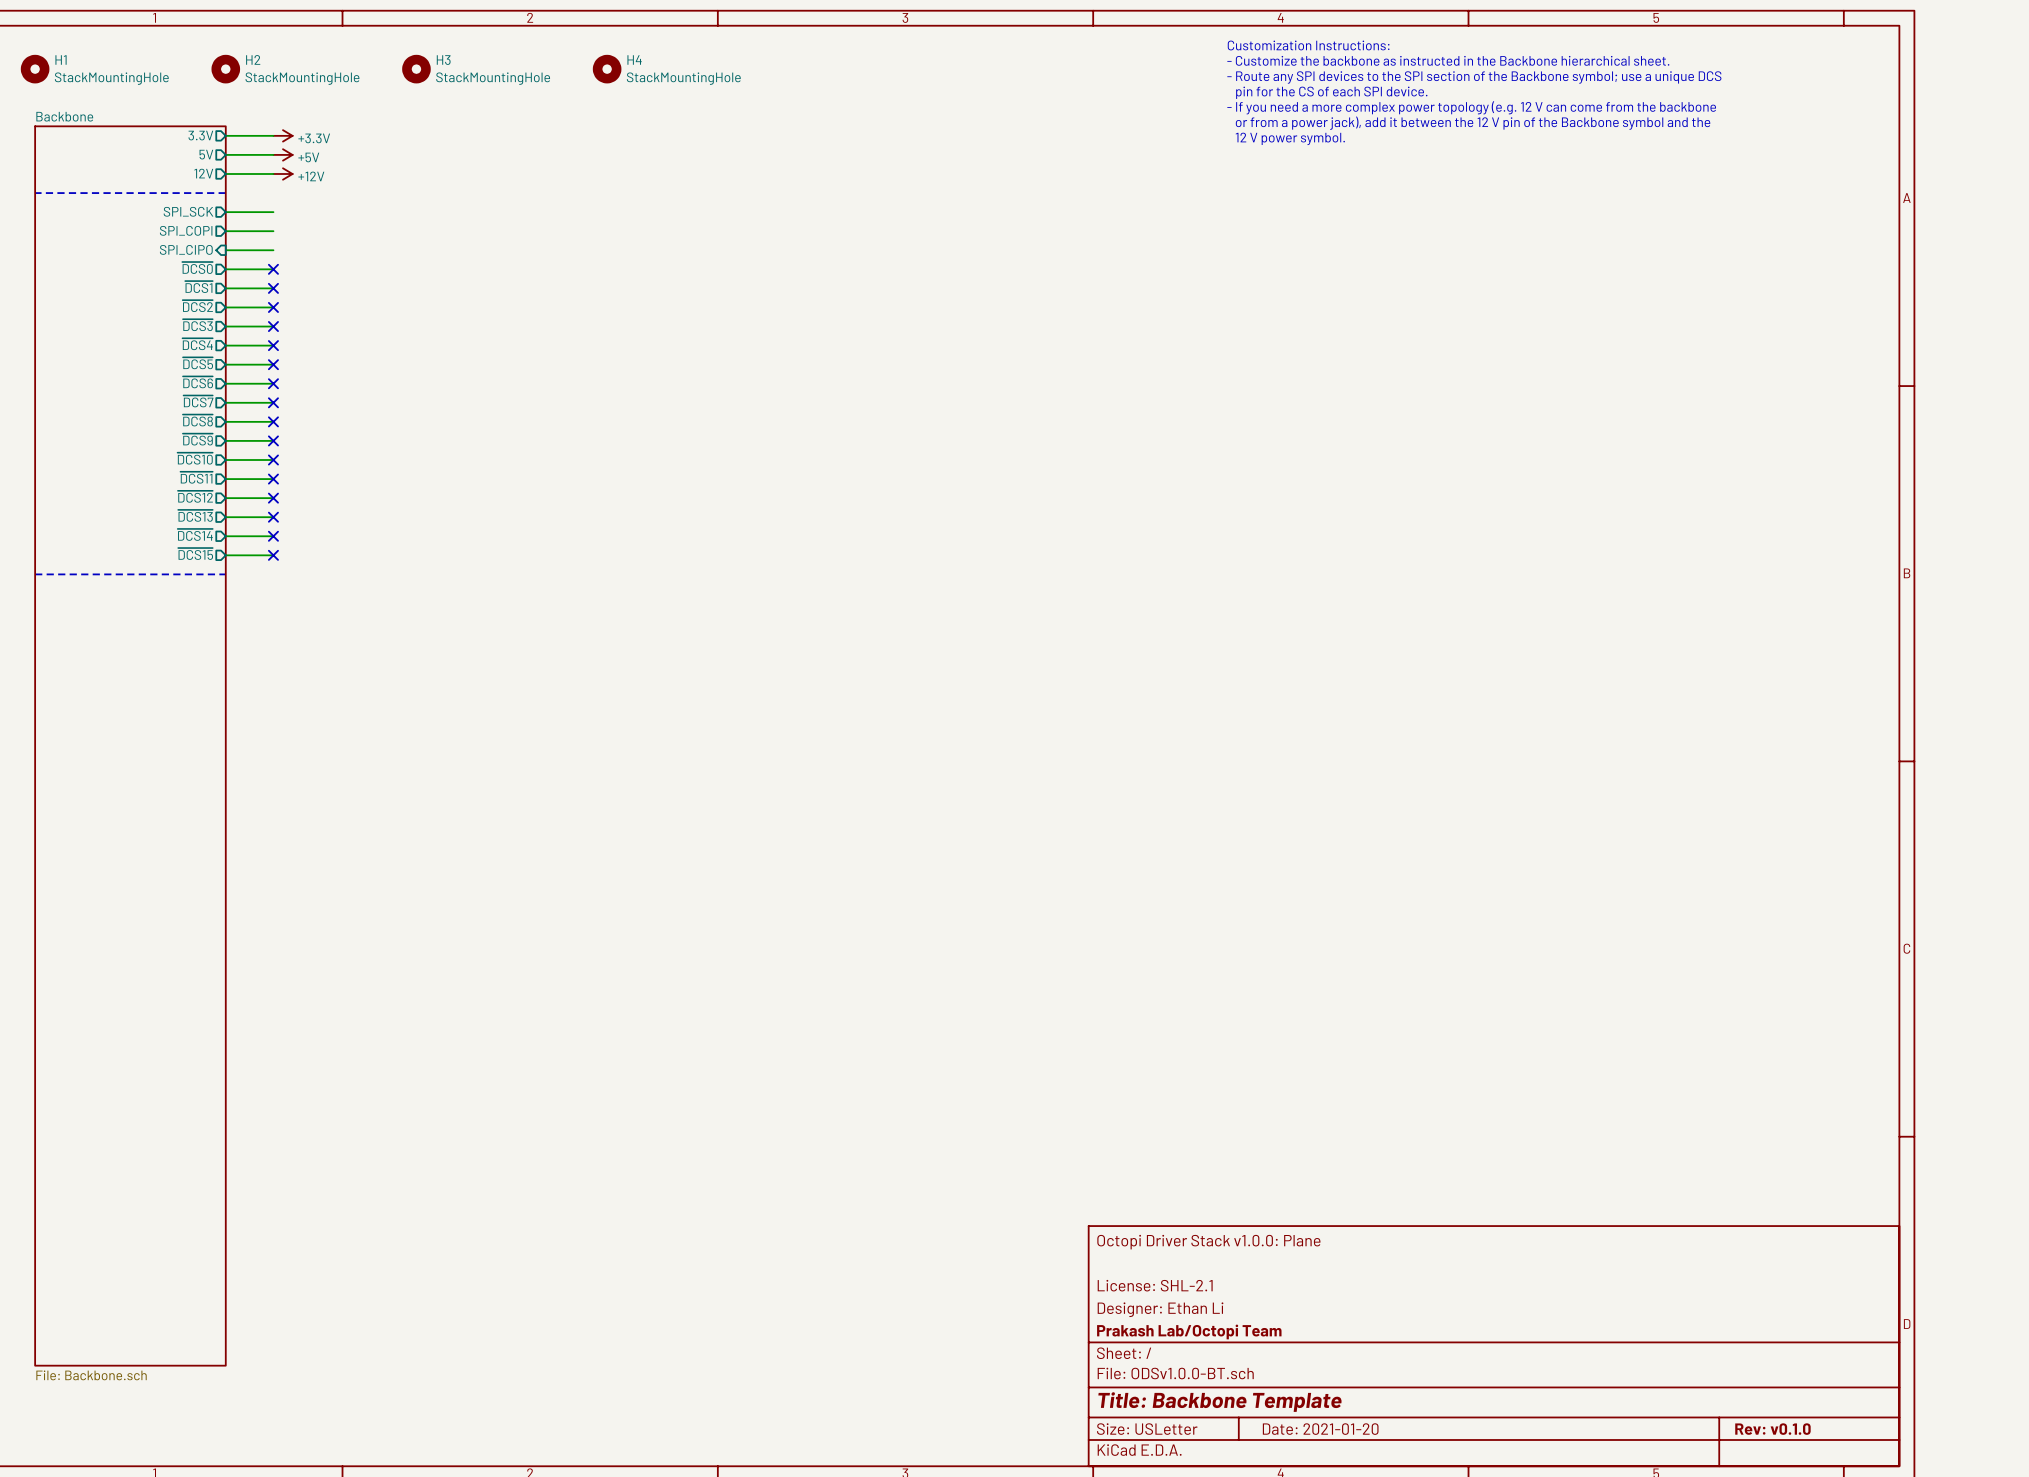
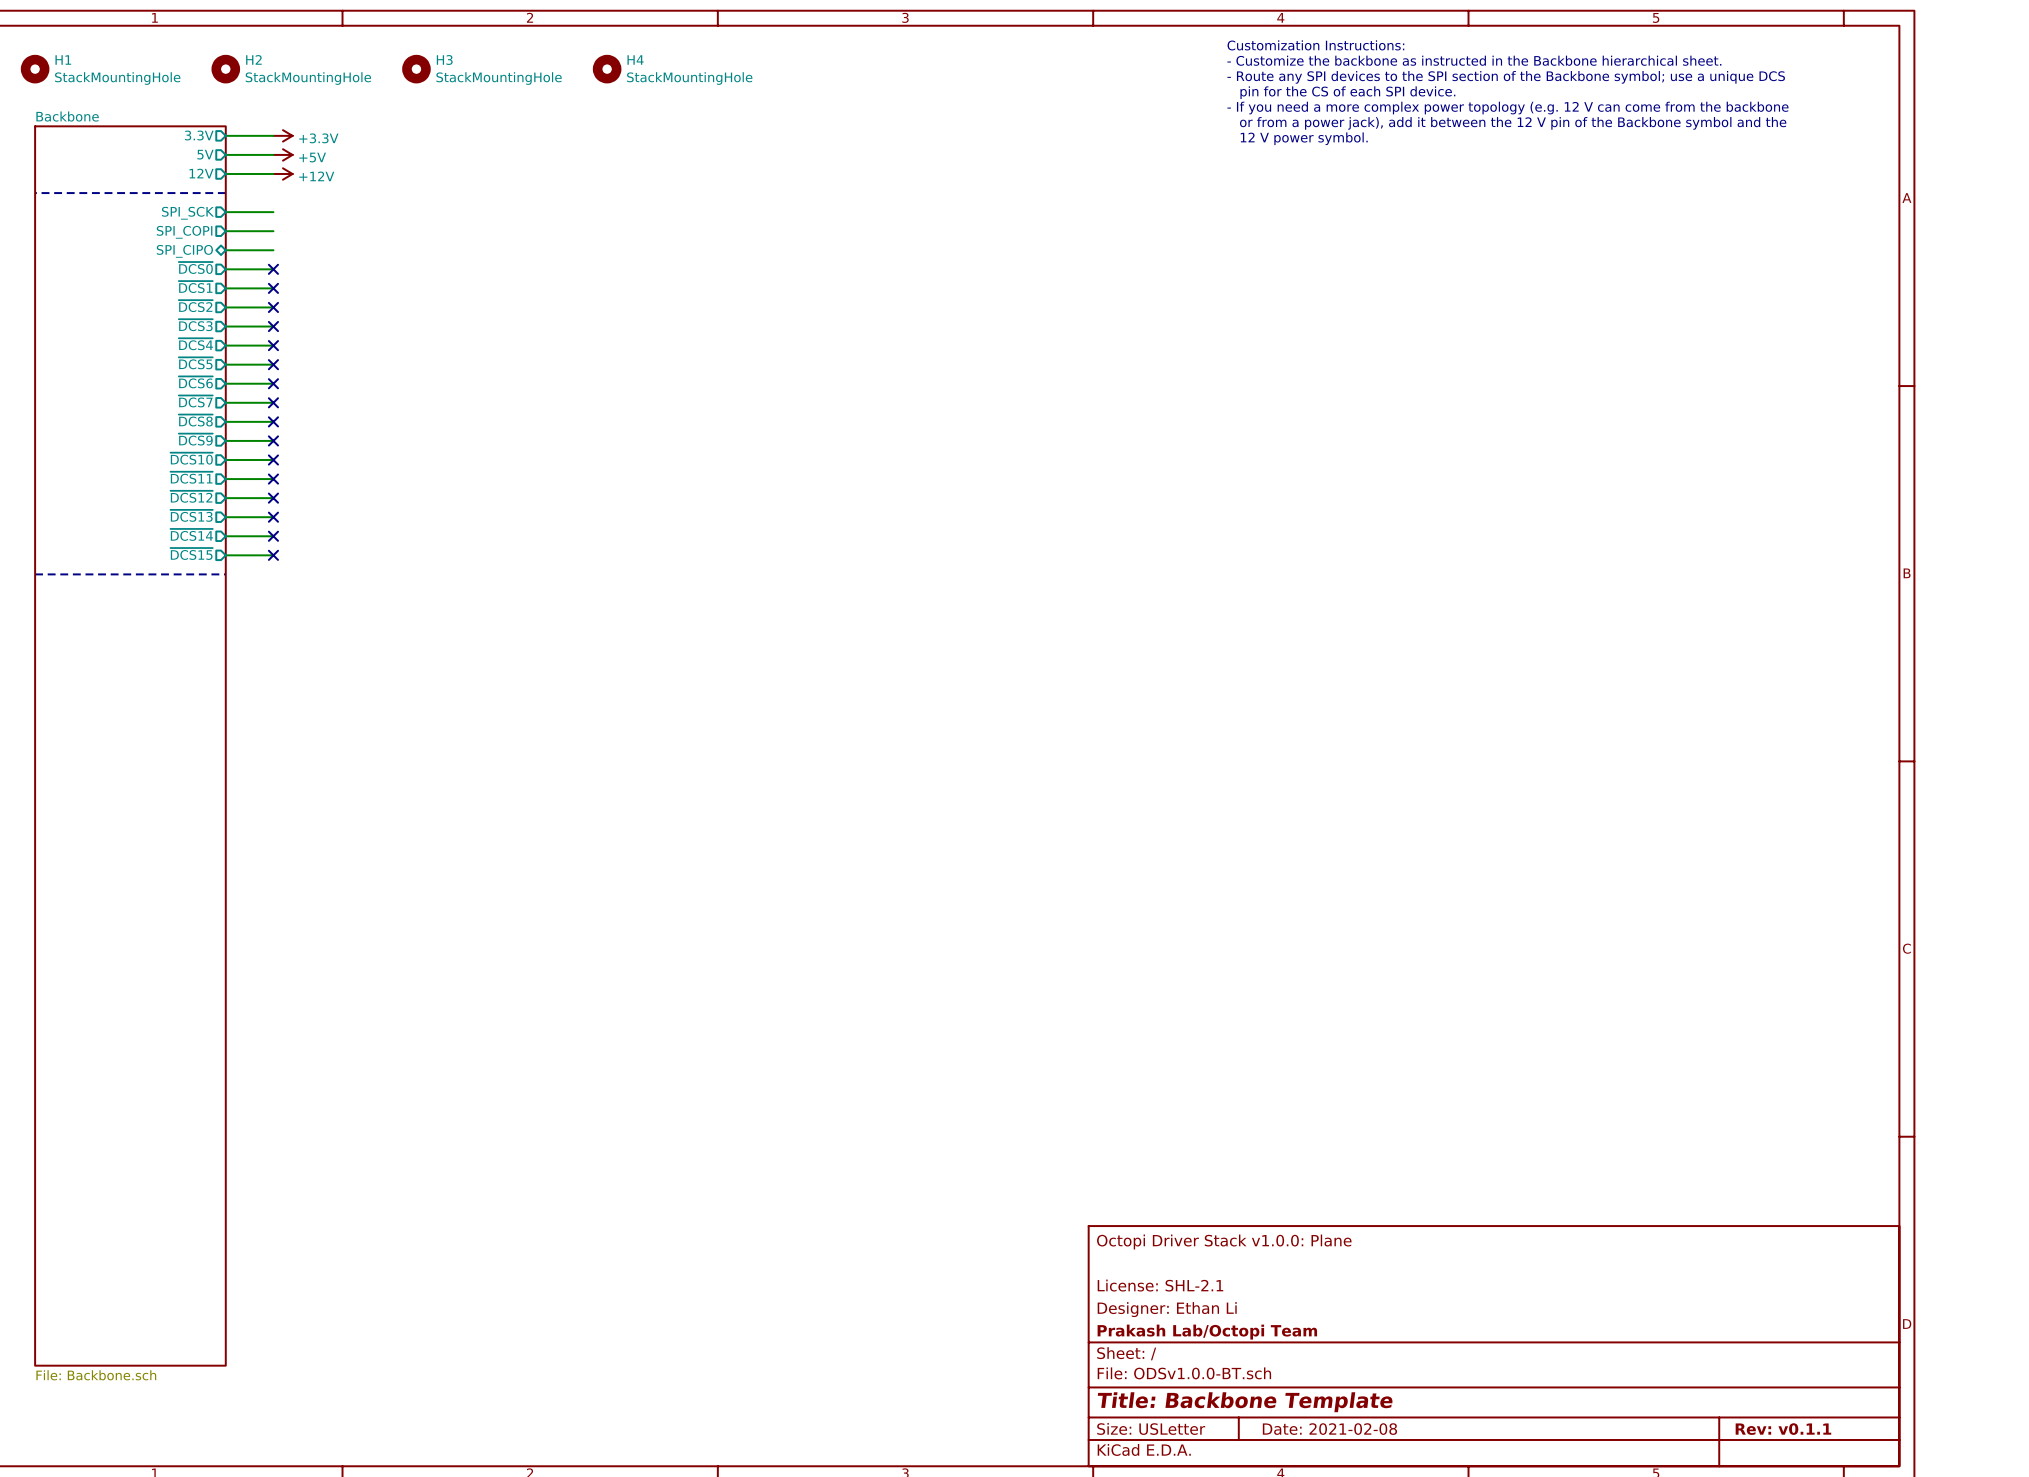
sheet pin shape: input (186, 249) -> bidirectional (184, 251)
title block: Date: 2021-01-20 (1320, 1429) -> Date: 2021-02-08 (1329, 1429)
title block: Rev: v0.1.0 (1772, 1429) -> Rev: v0.1.1 (1783, 1429)

